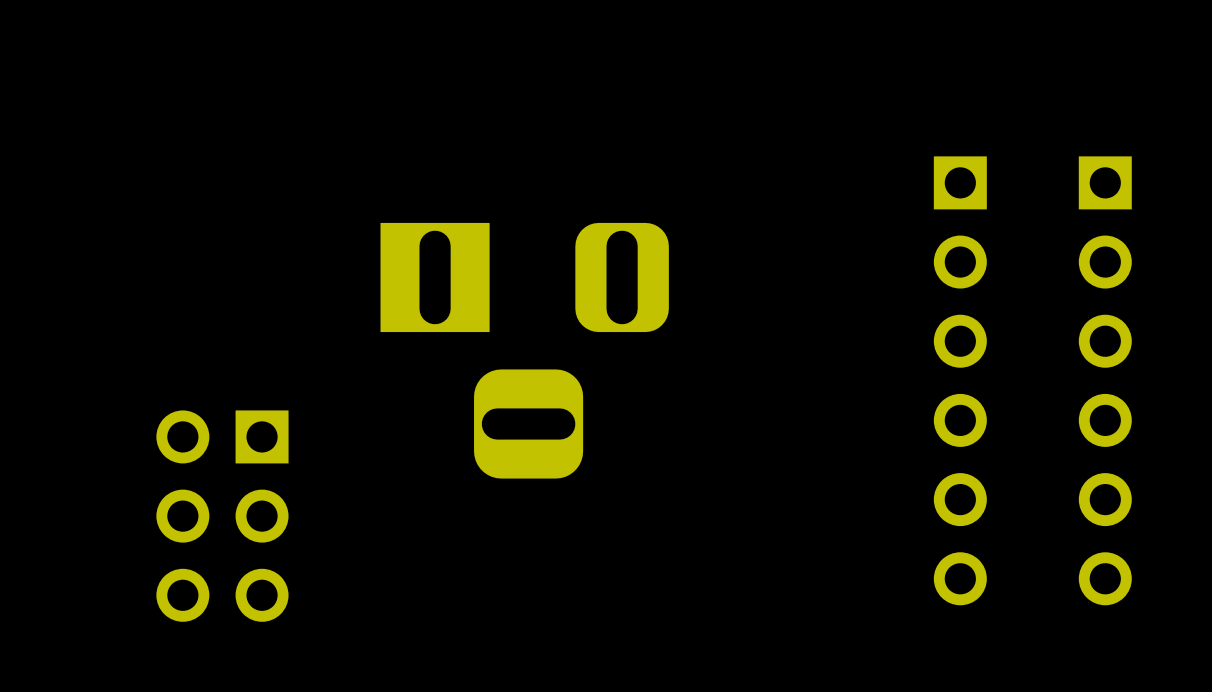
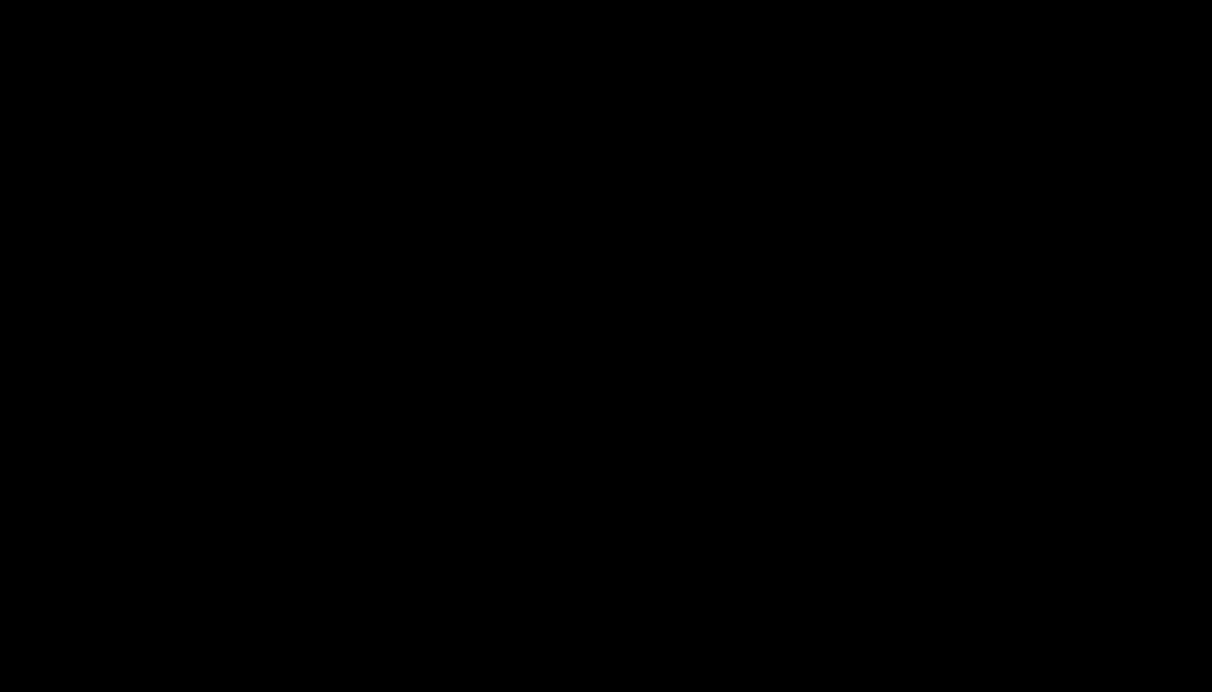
part: (524, 350) -> none
part: (960, 380) -> none
part: (1105, 380) -> none
part: (222, 516) -> none

